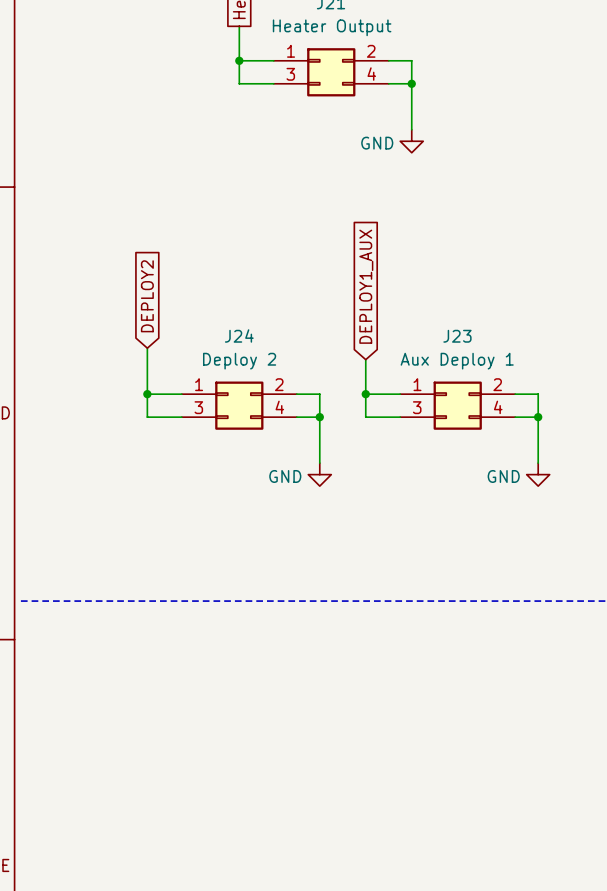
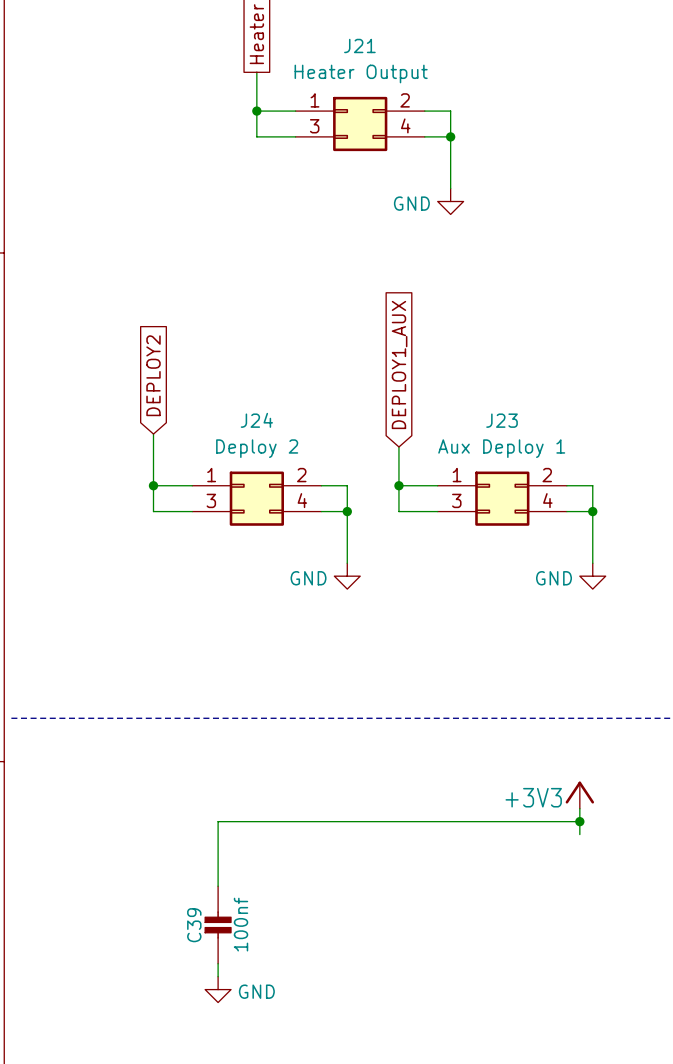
power symbol: none -> +3V3 (579, 795)
wire: none -> (579, 808) (579, 834)
wire: none -> (579, 821) (218, 821) (218, 886)
junction: none -> (579, 821)
C39: none -> 100nf (218, 925)
wire: none -> (218, 963) (218, 976)
power symbol: none -> GND (218, 989)

